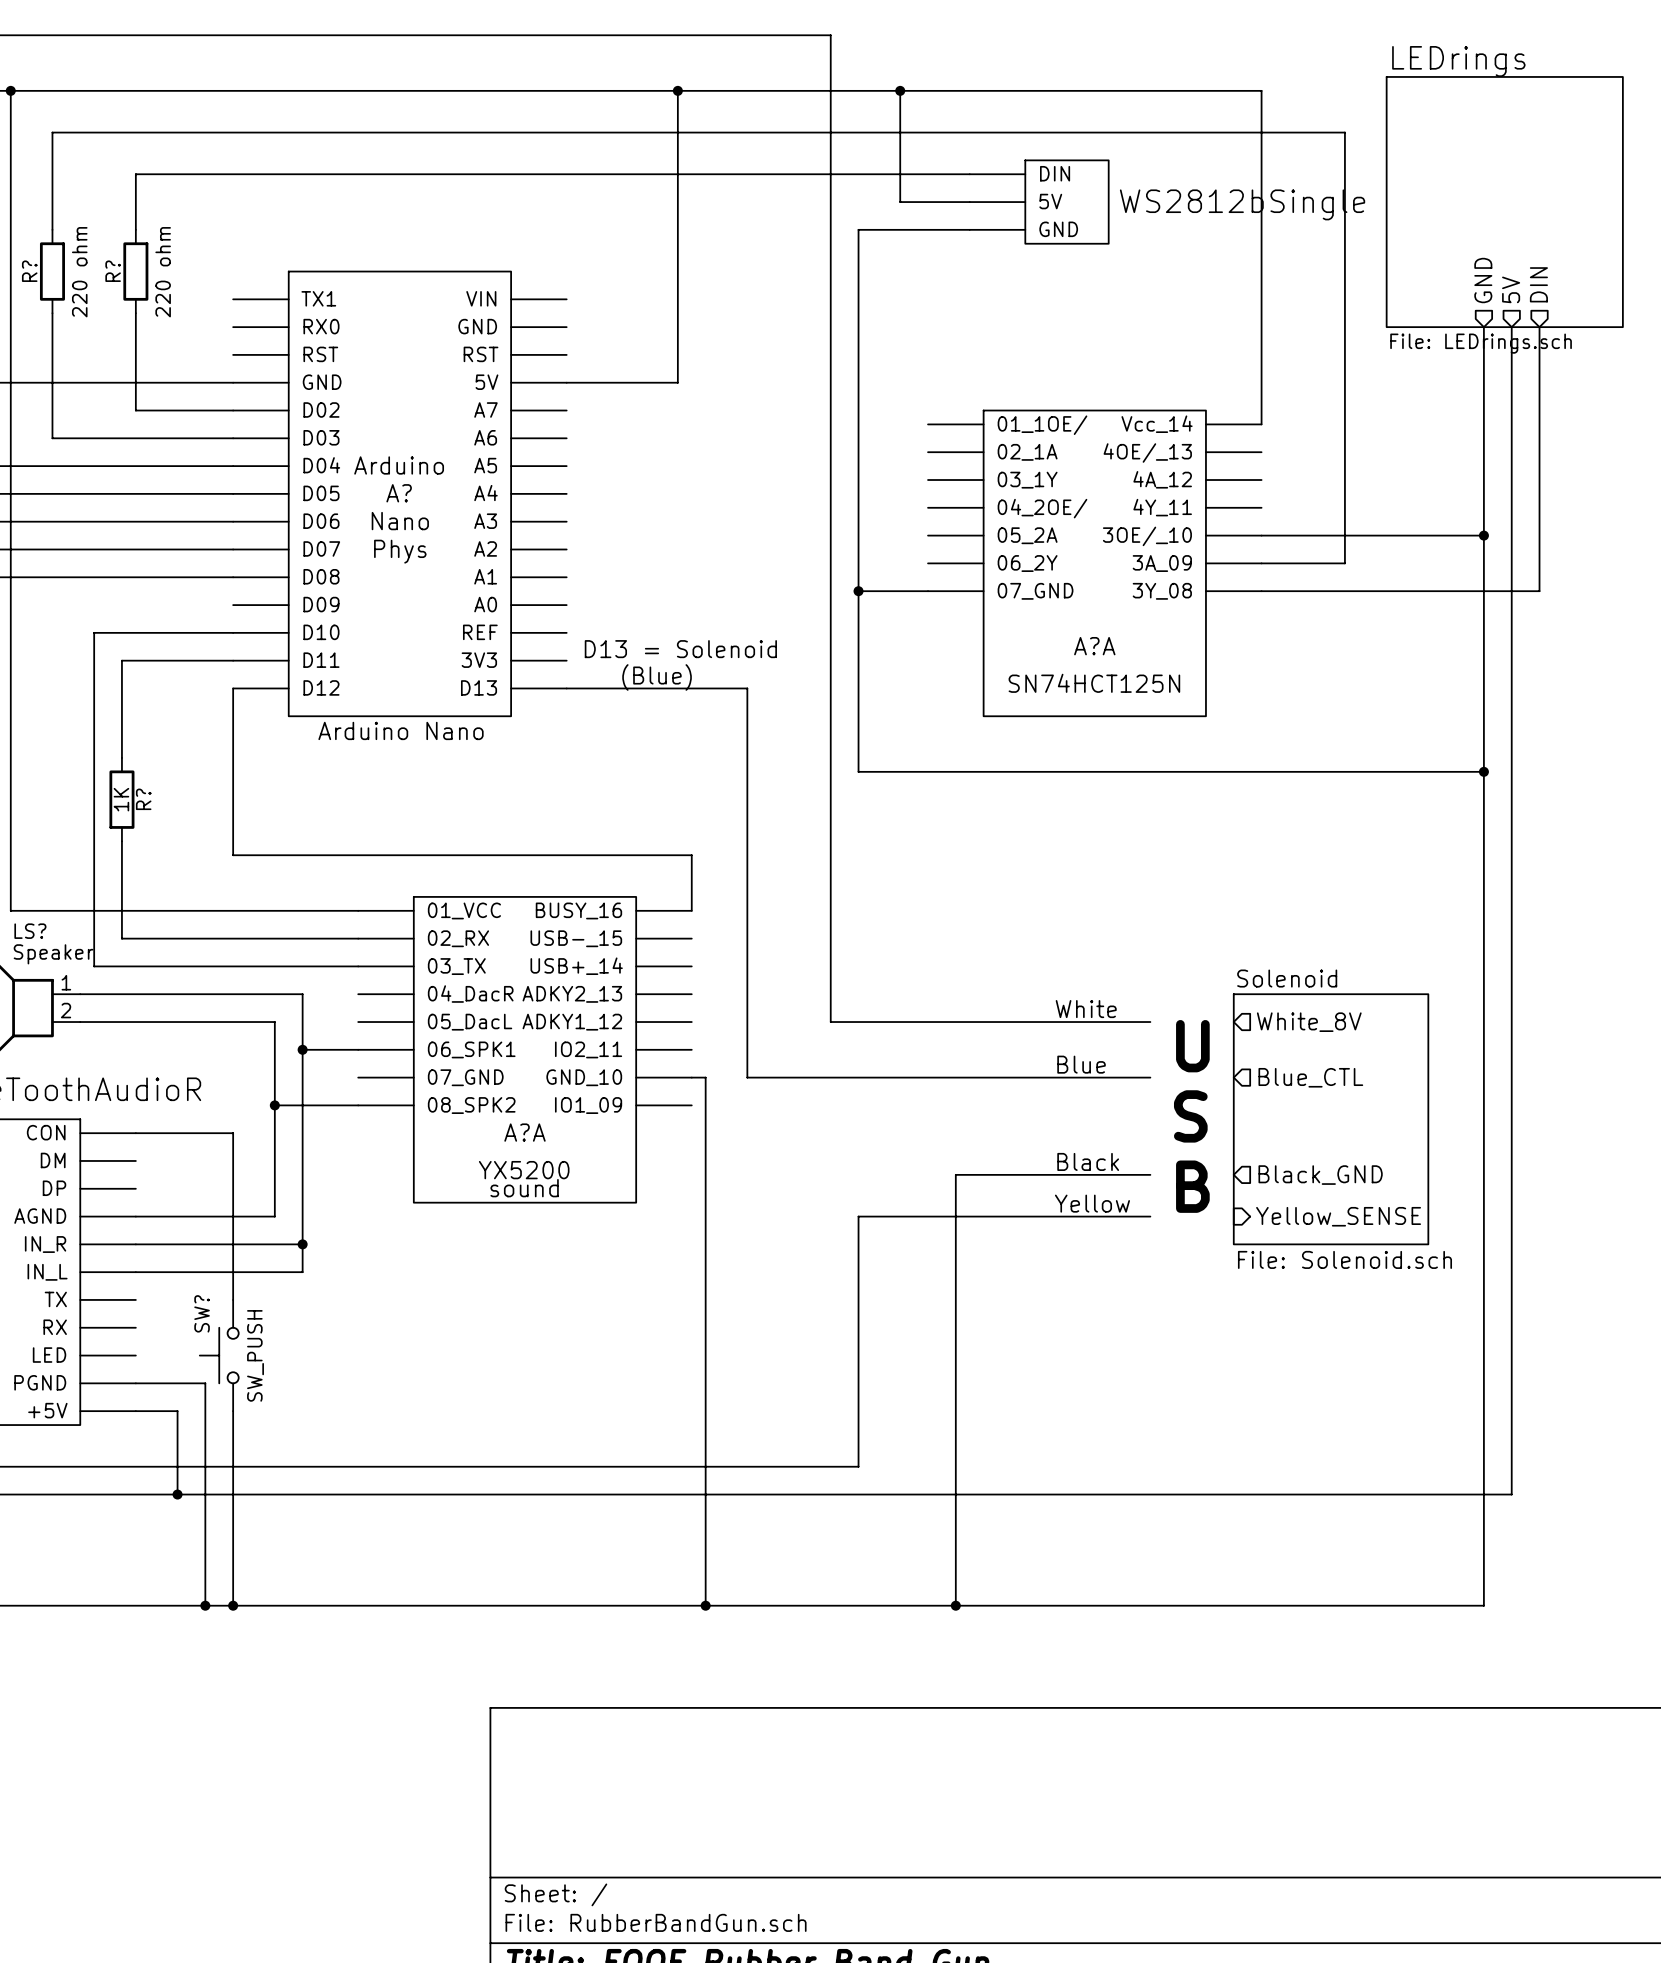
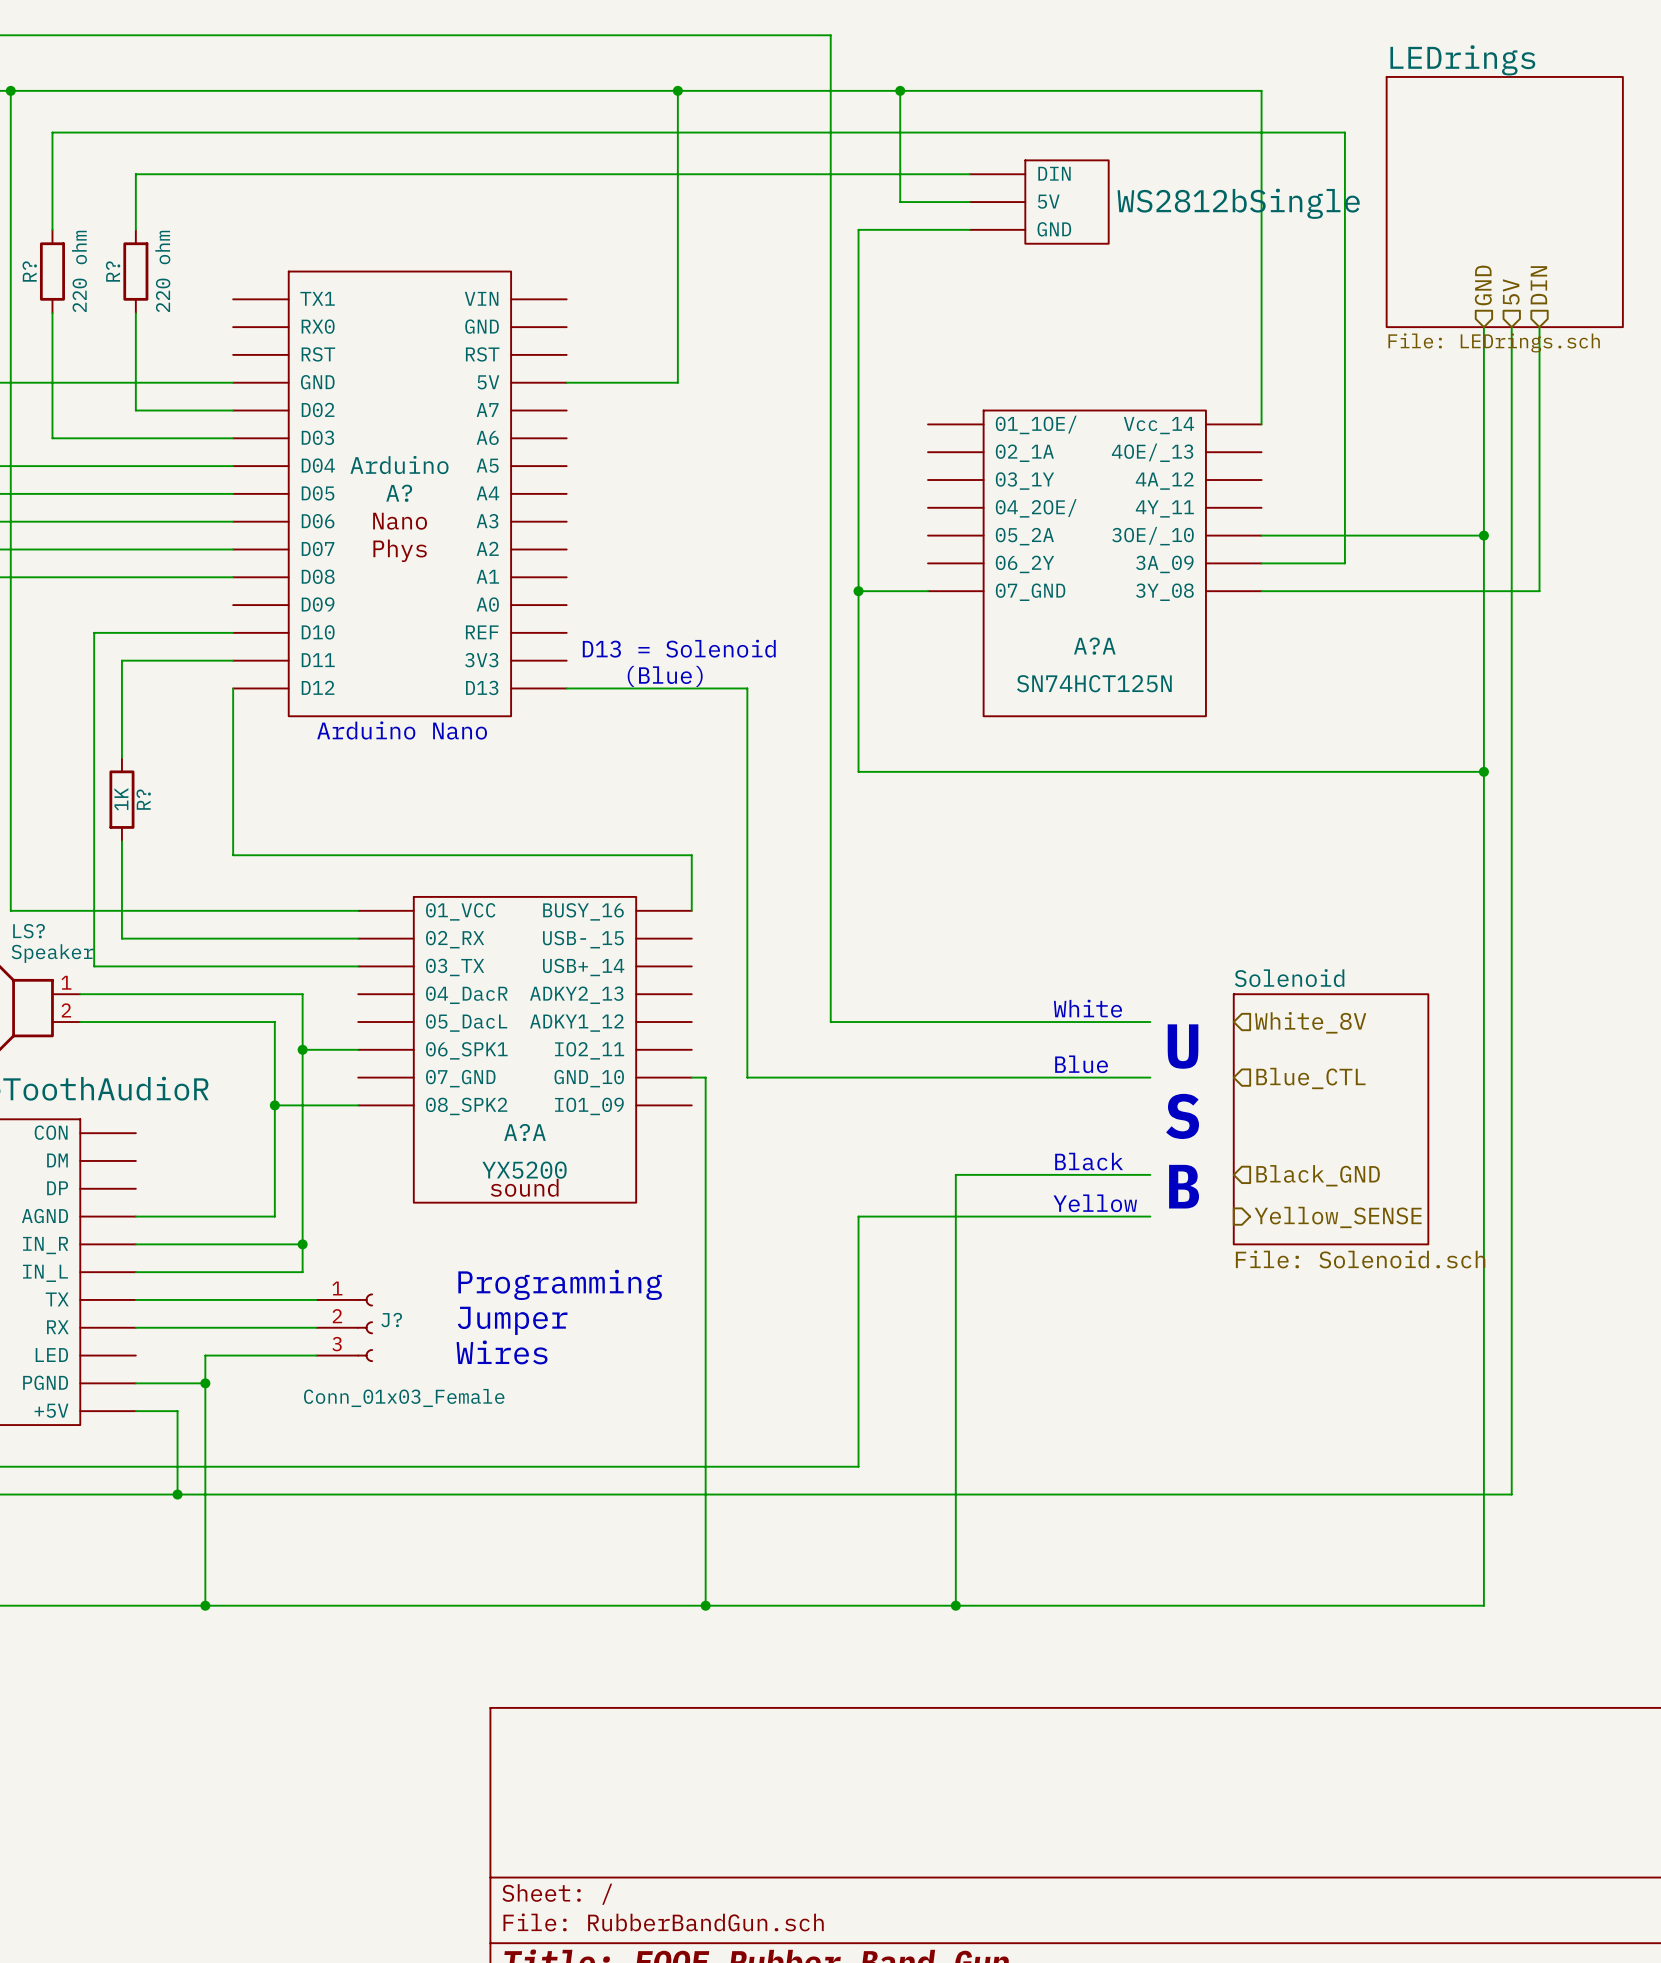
wire: (135, 1133) (233, 1133) (233, 1299) -> none
text: none -> Programming (560, 1284)
wire: none -> (135, 1299) (316, 1299)
text: none -> Jumper (512, 1320)
wire: none -> (135, 1327) (316, 1327)
J?: none -> Conn_01x03_Female (344, 1327)
text: none -> Wires (502, 1352)
SW?: SW_PUSH (219, 1355) -> none
wire: none -> (316, 1355) (205, 1355) (205, 1383)
junction: none -> (205, 1383)
wire: (233, 1411) (233, 1605) -> none
junction: (233, 1605) -> none

